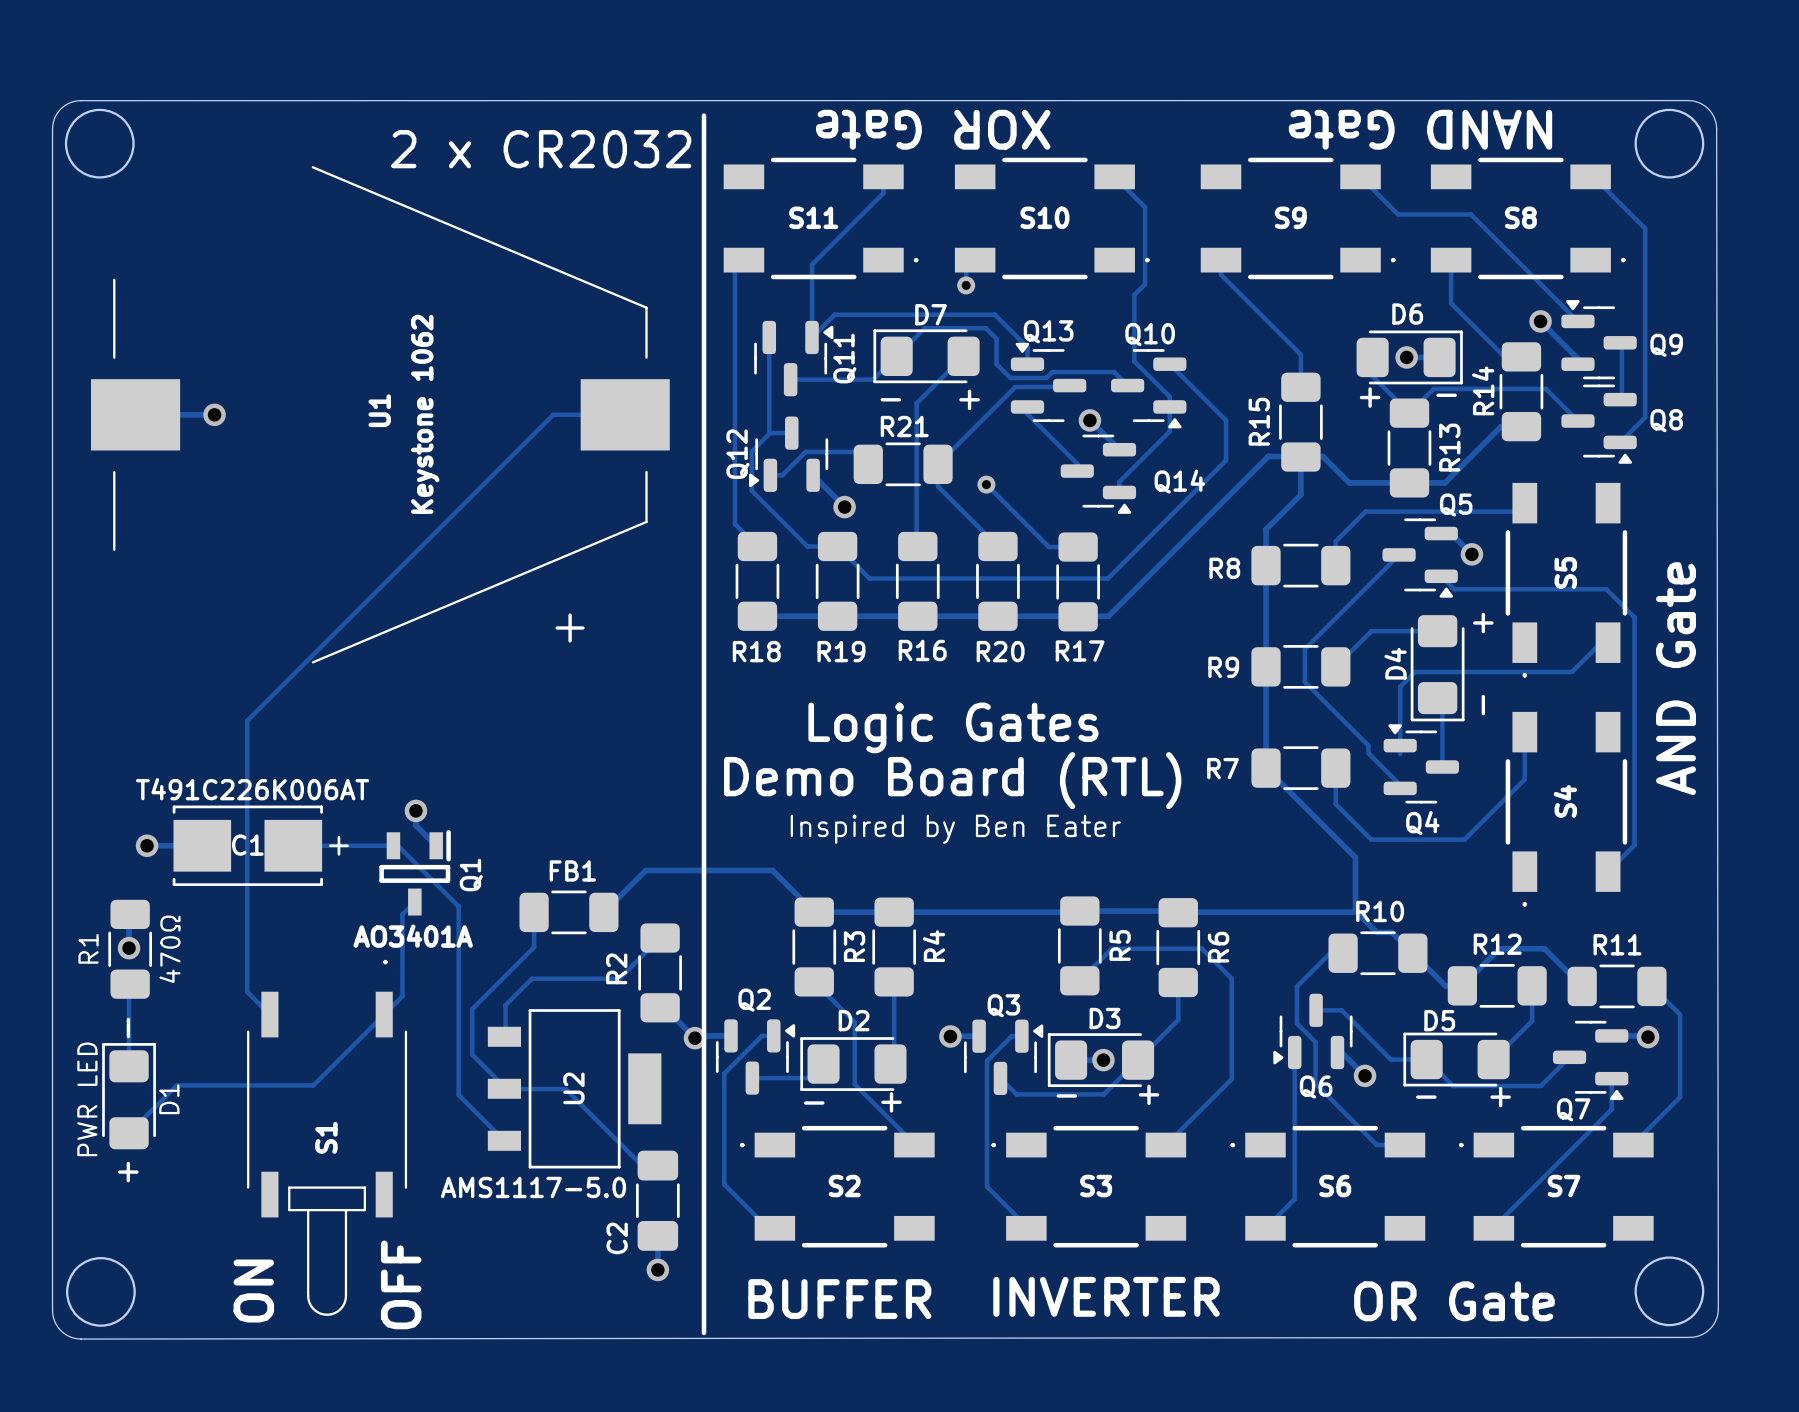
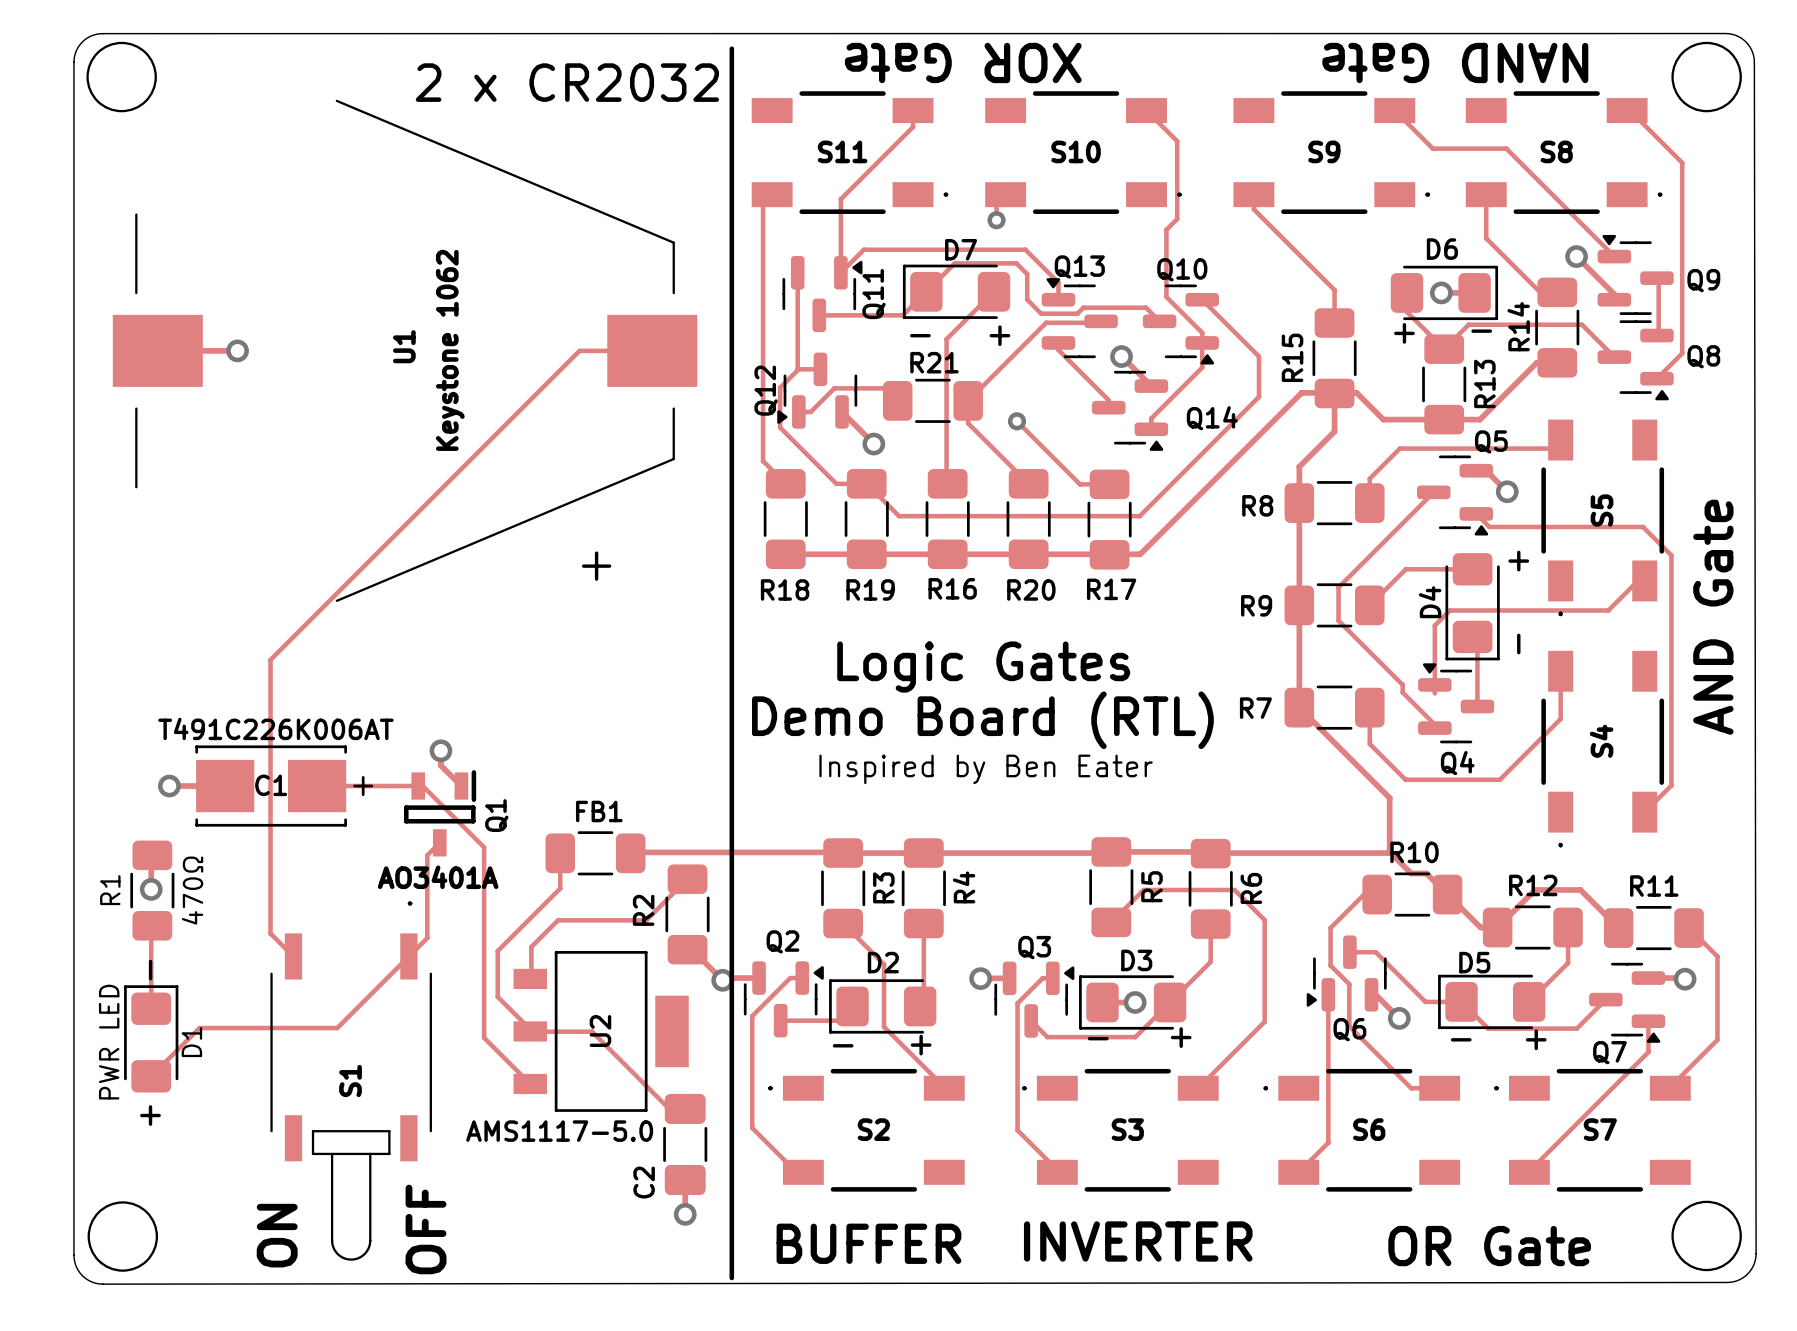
track: (604, 911) (645, 870) (772, 870) (813, 911) -> (631, 852) (842, 852)

